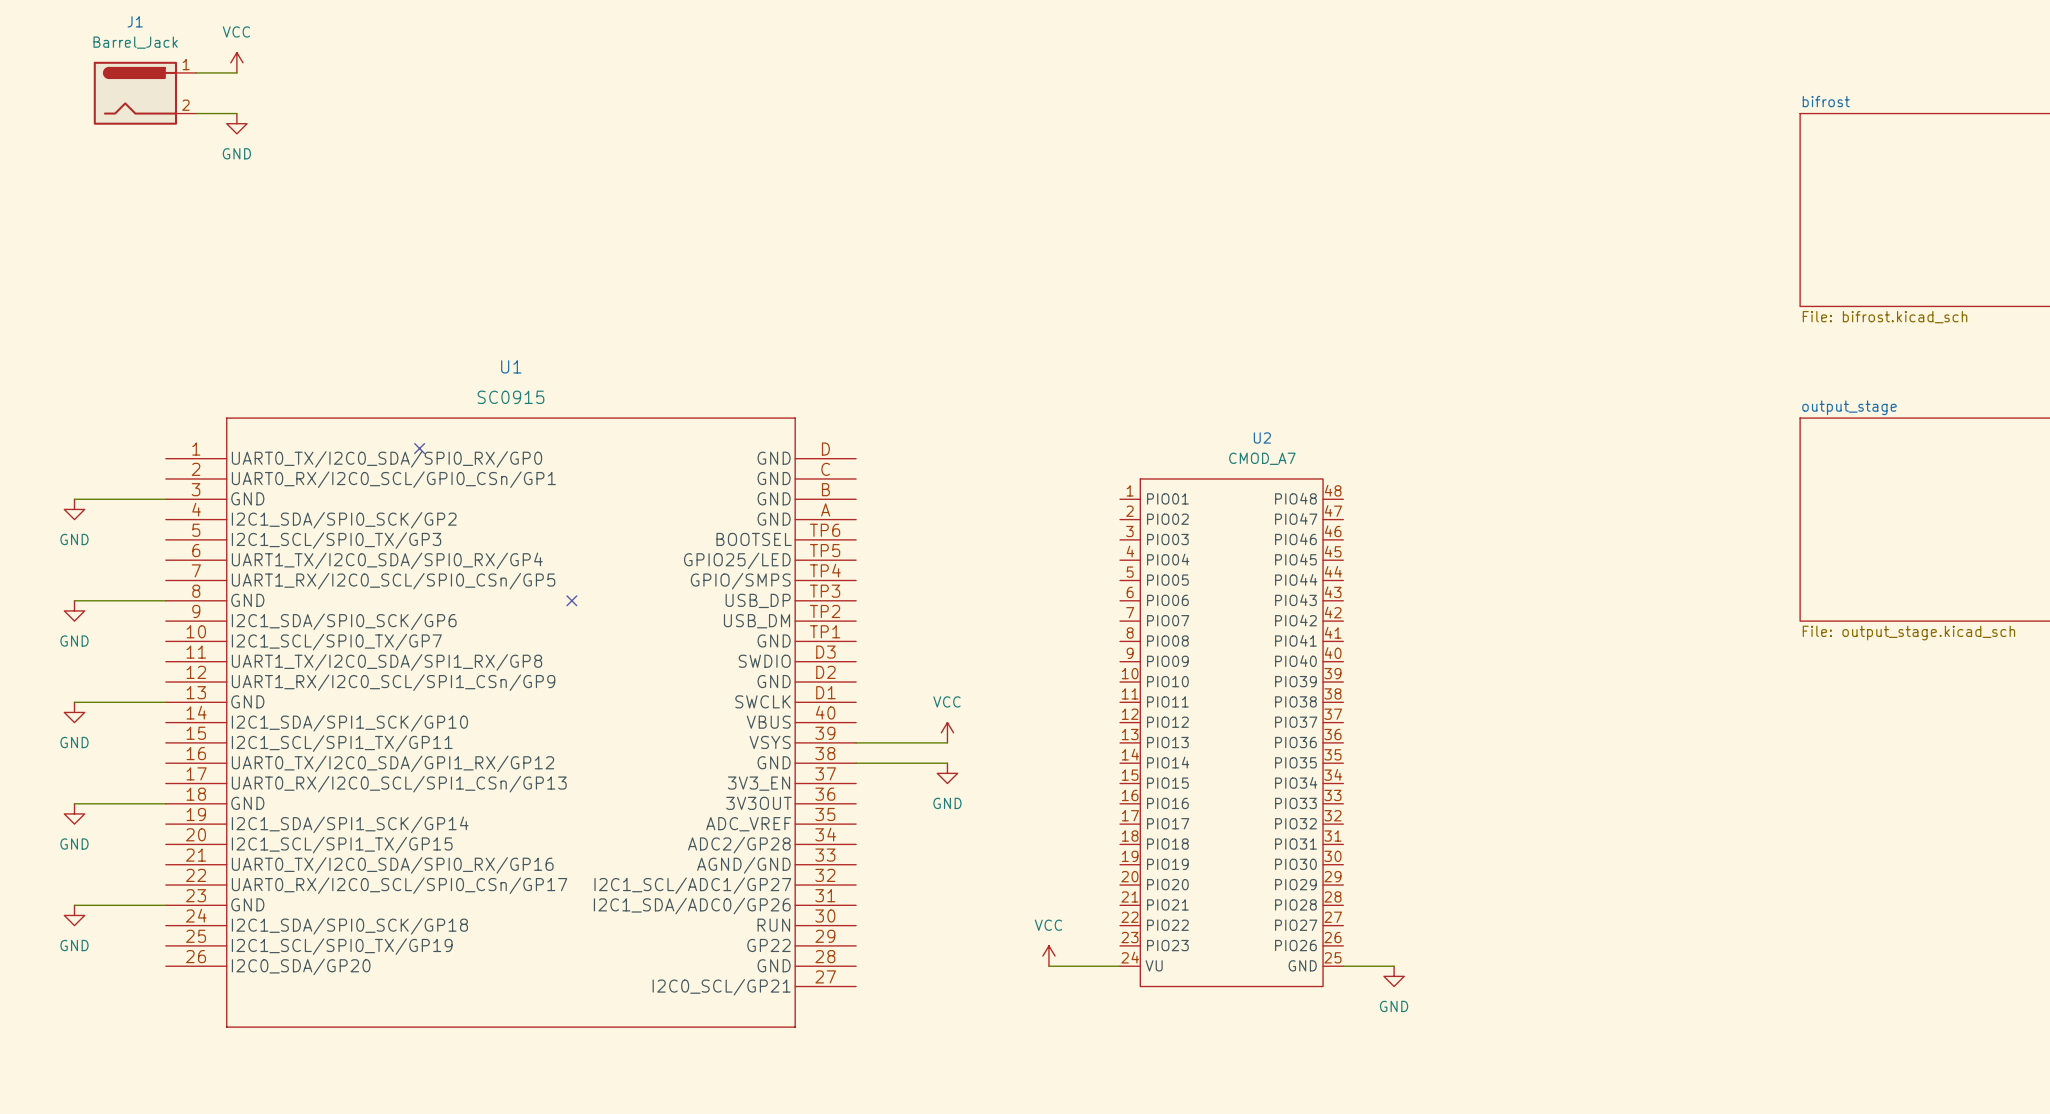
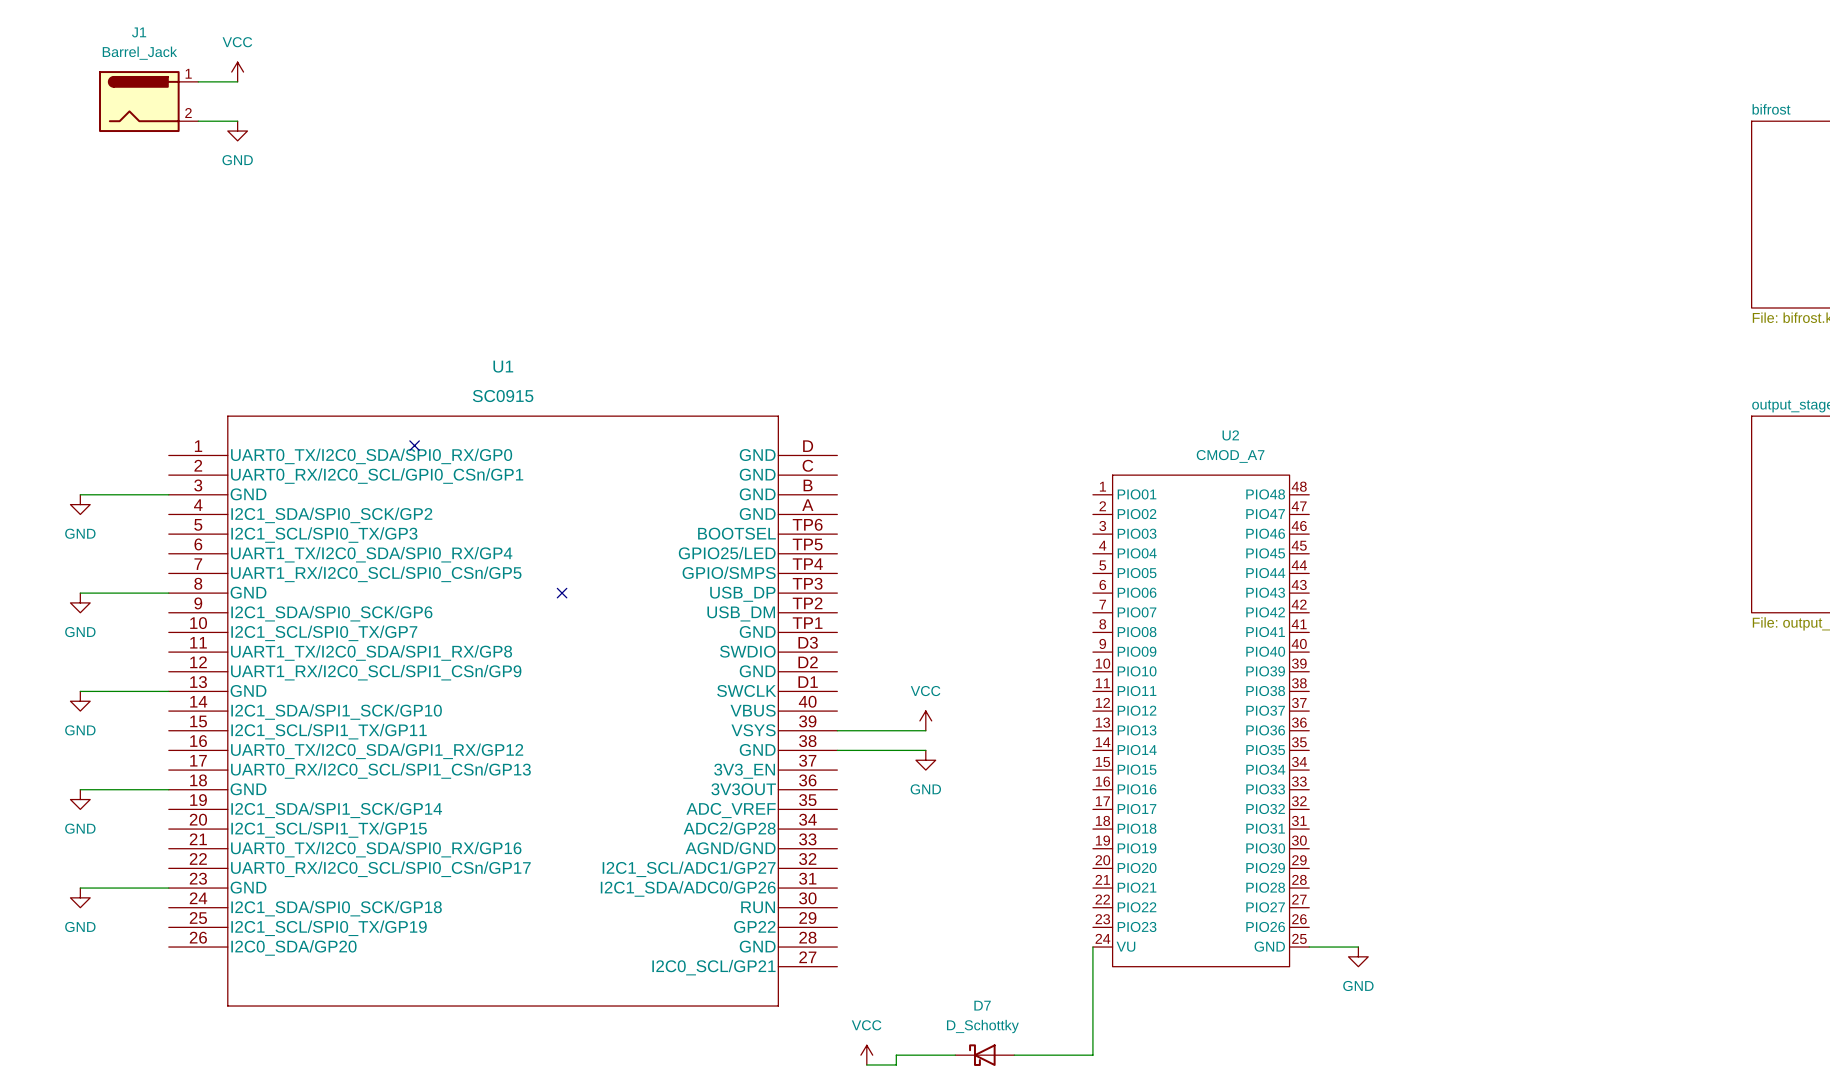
power symbol: VCC (1048, 956) -> none
wire: (1048, 966) (1120, 966) -> (1014, 1055) (1092, 1055) (1092, 947)
power symbol: none -> VCC (866, 1055)
wire: none -> (955, 1055) (896, 1055) (896, 1064) (866, 1064)
D7: none -> D_Schottky (984, 1055)

